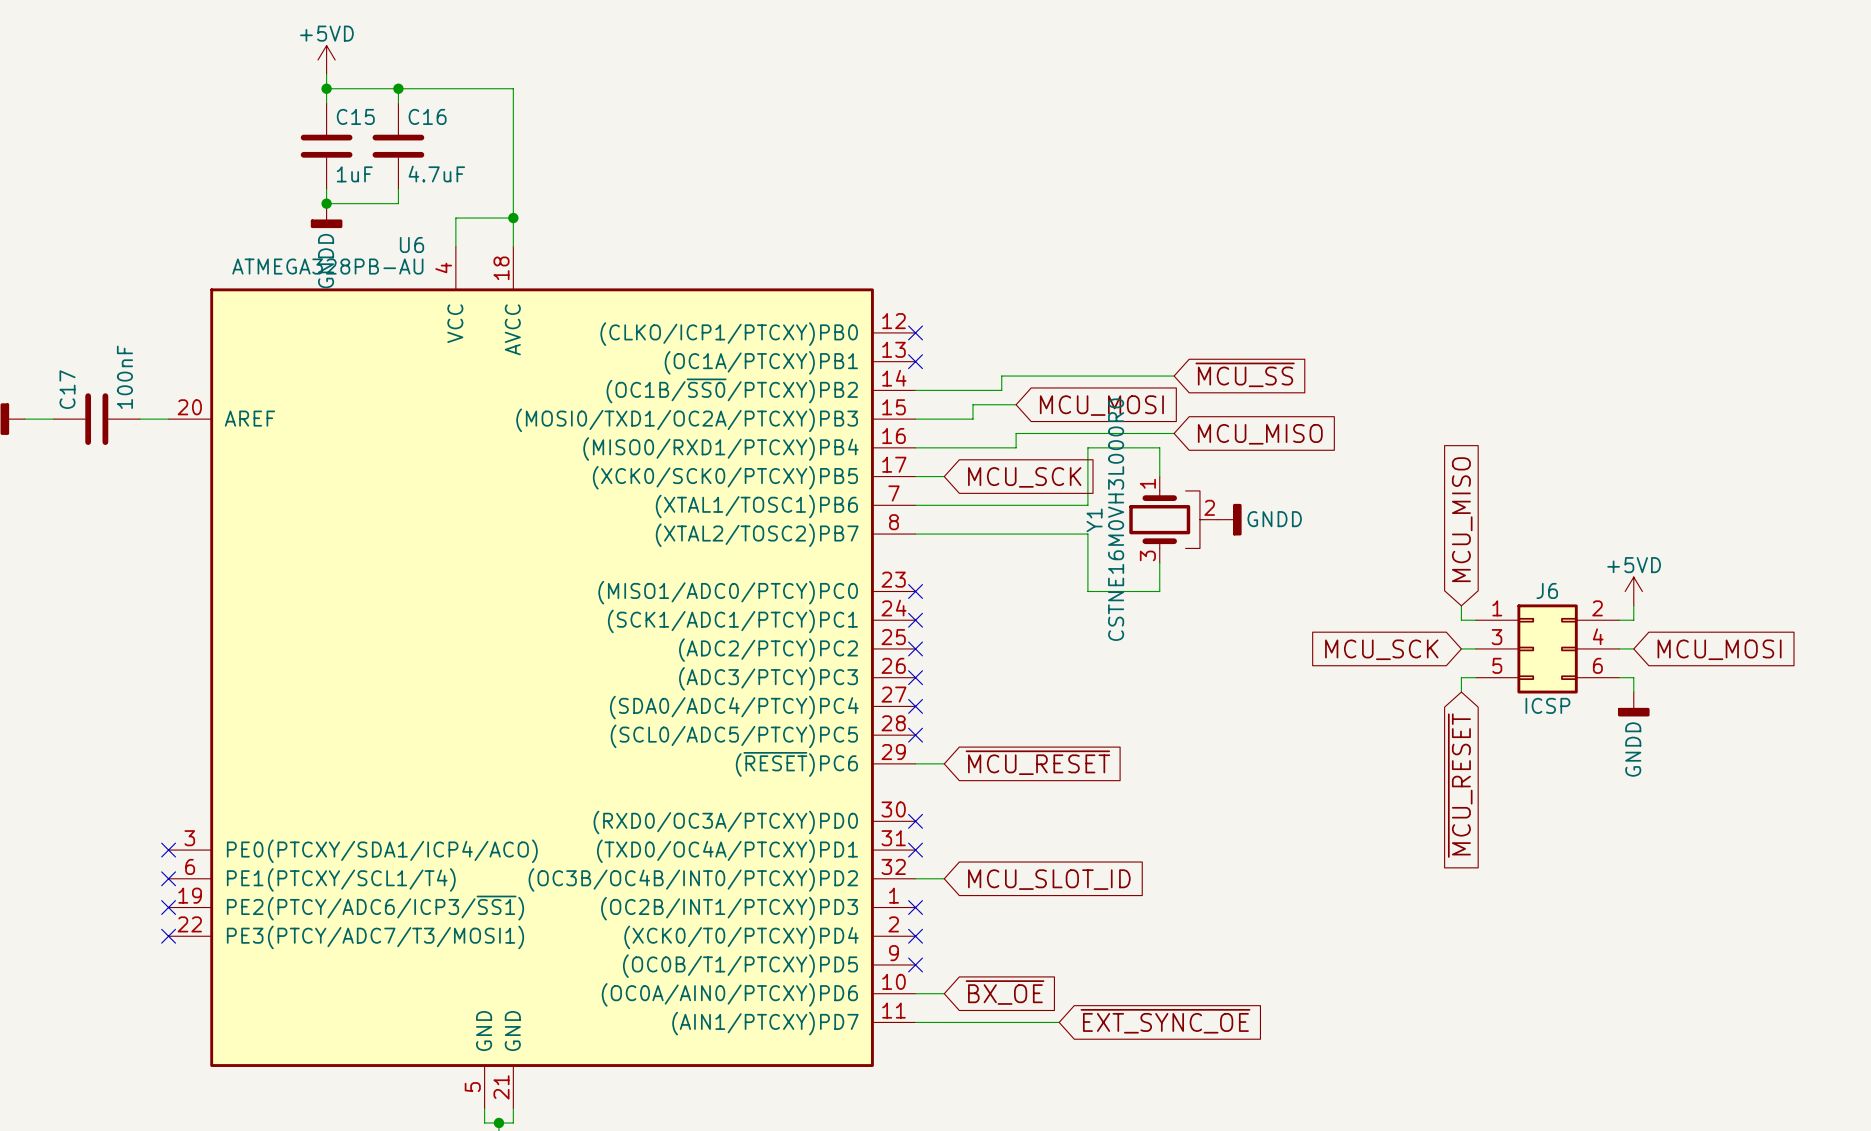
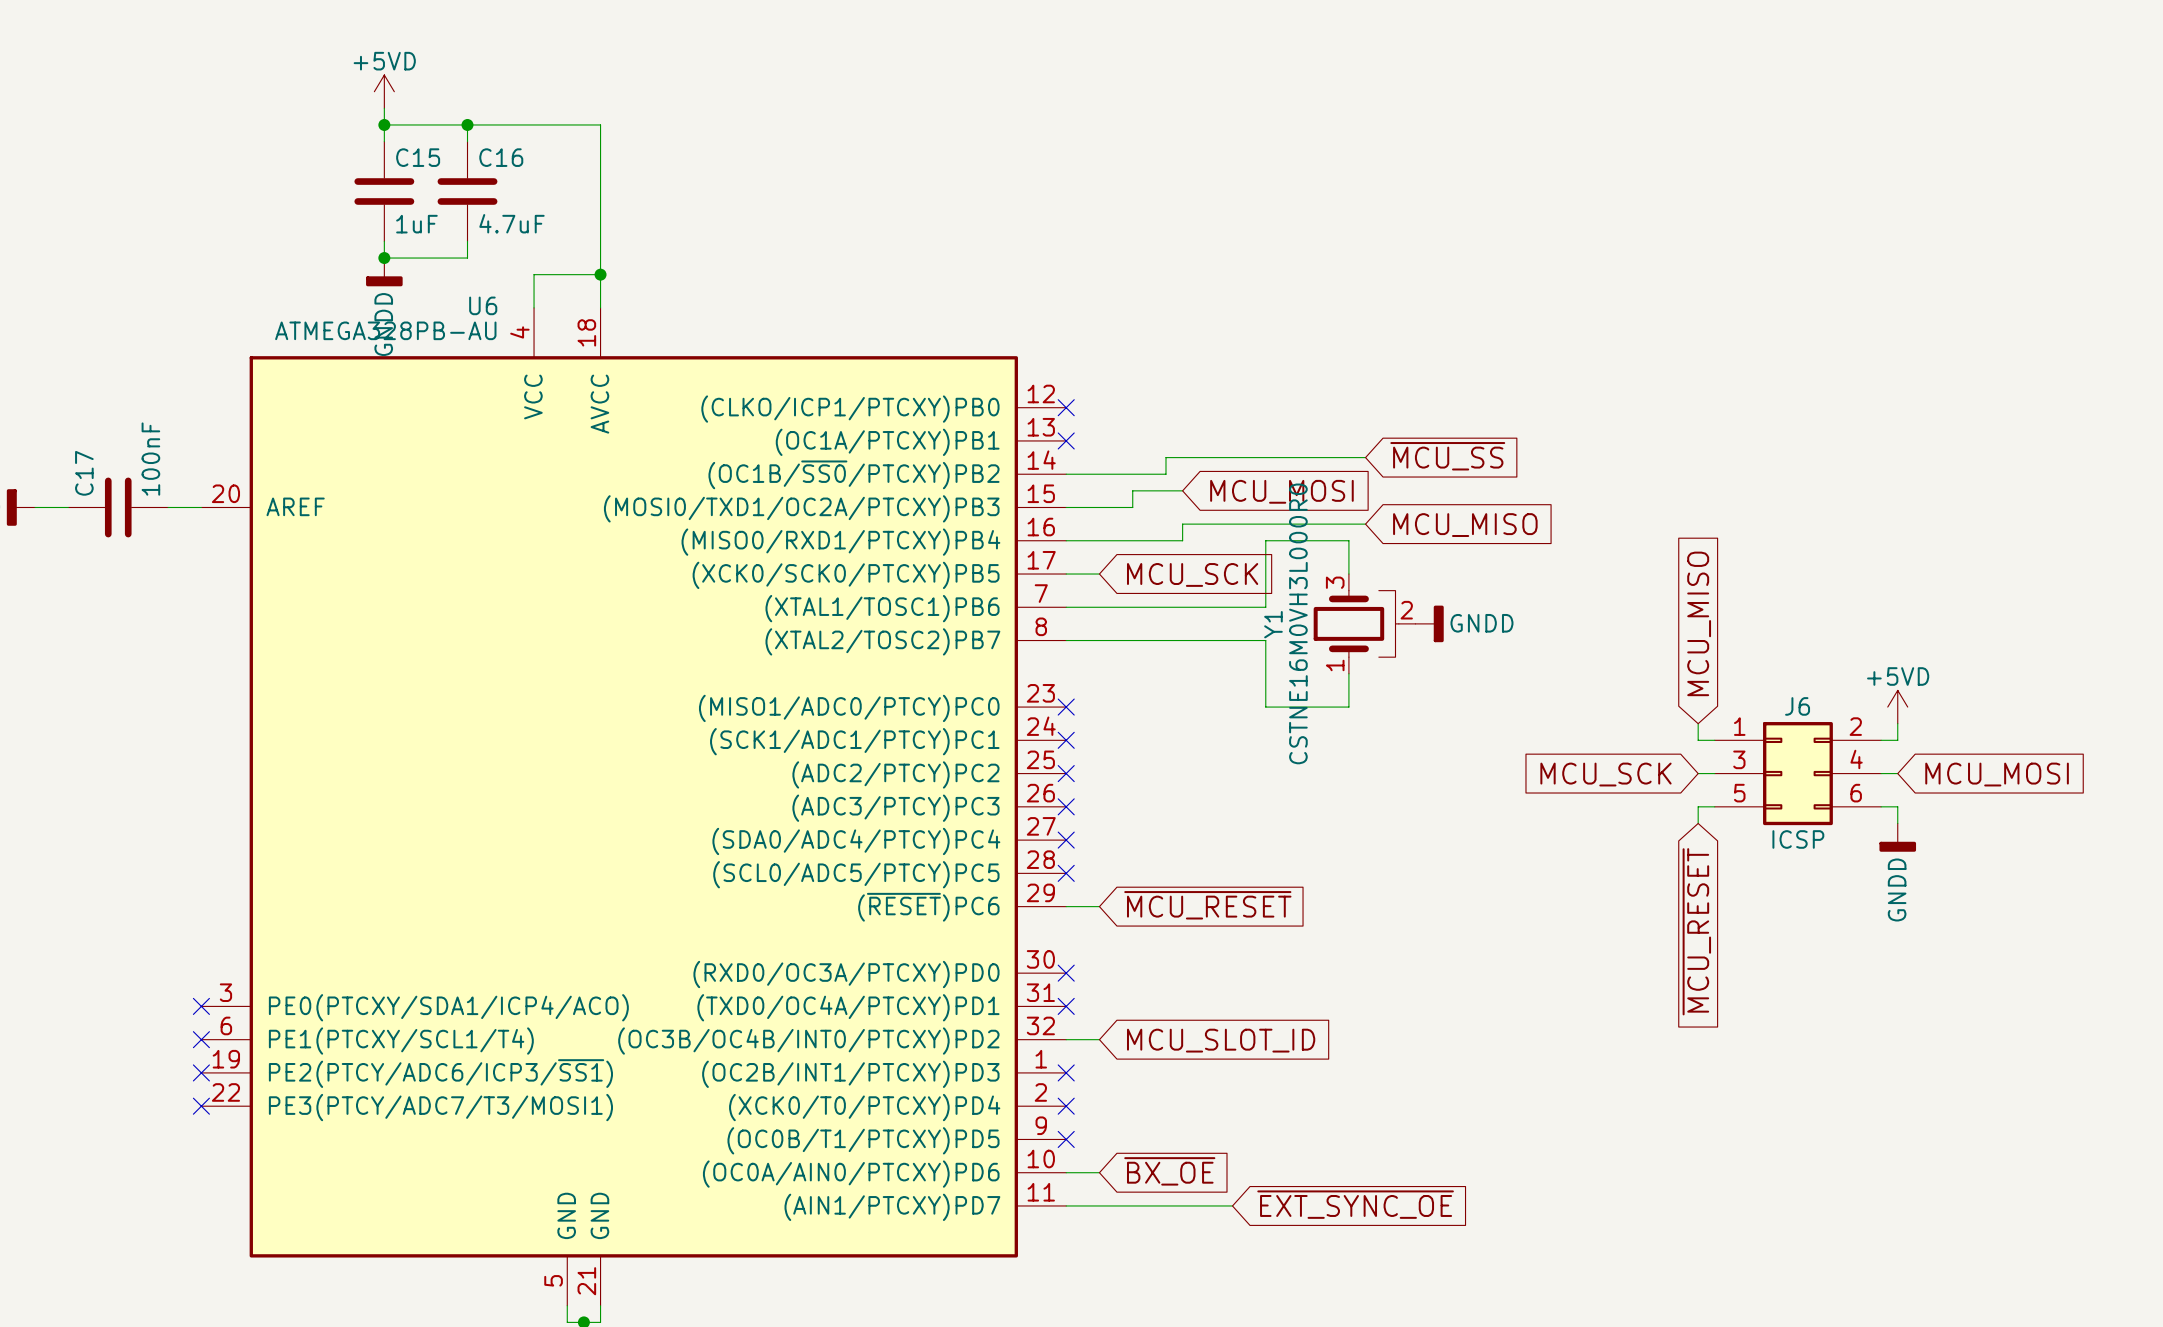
Y1 flip: as is (1166, 519) -> up-down (1356, 623)

